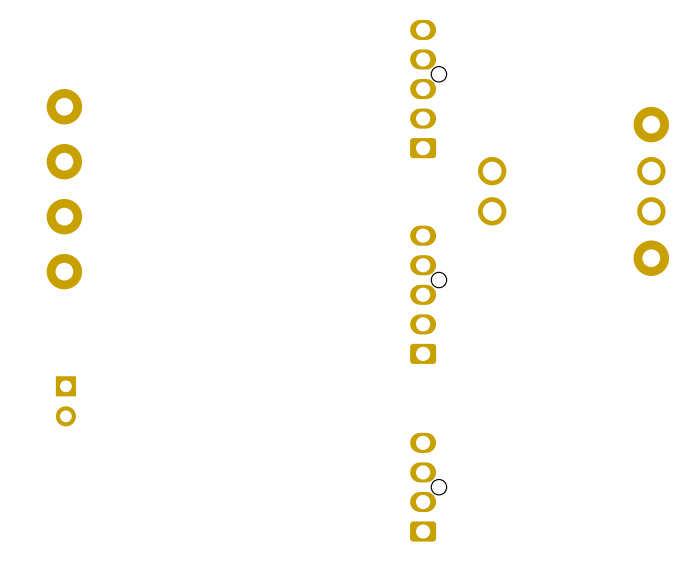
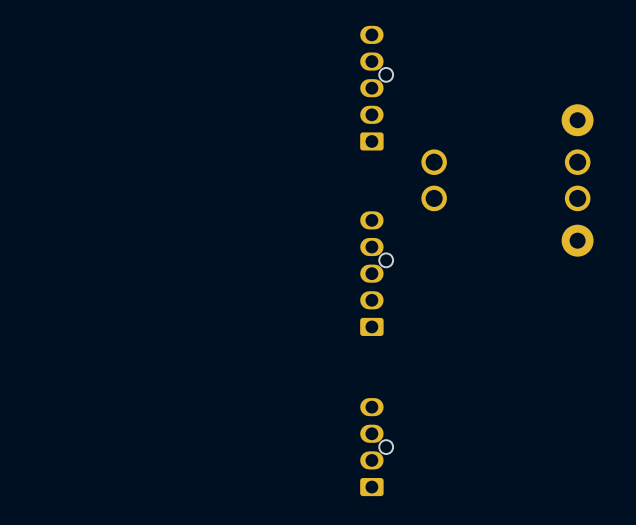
part: (64, 106) -> none
part: (64, 161) -> none
part: (64, 216) -> none
part: (64, 271) -> none
part: (65, 401) -> none

